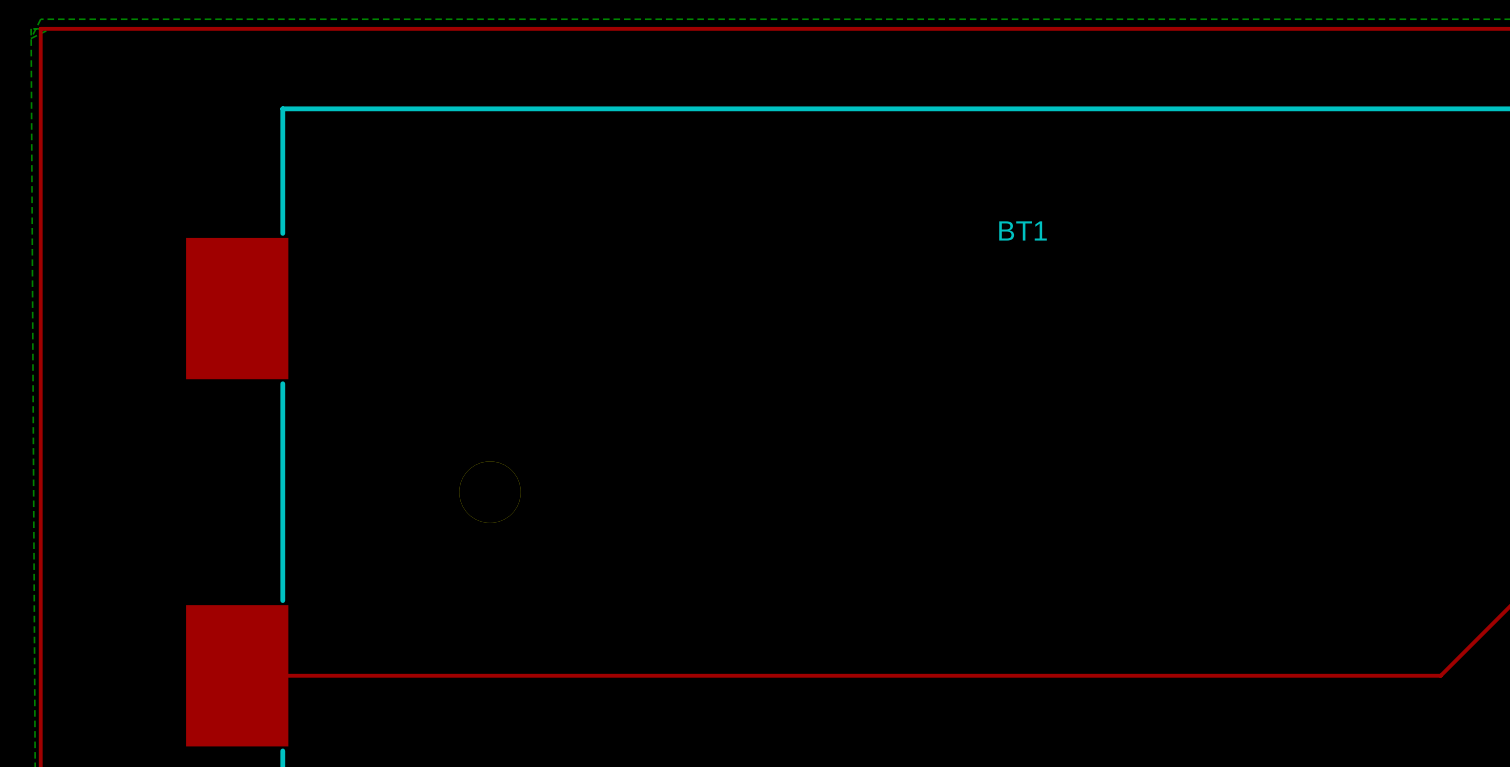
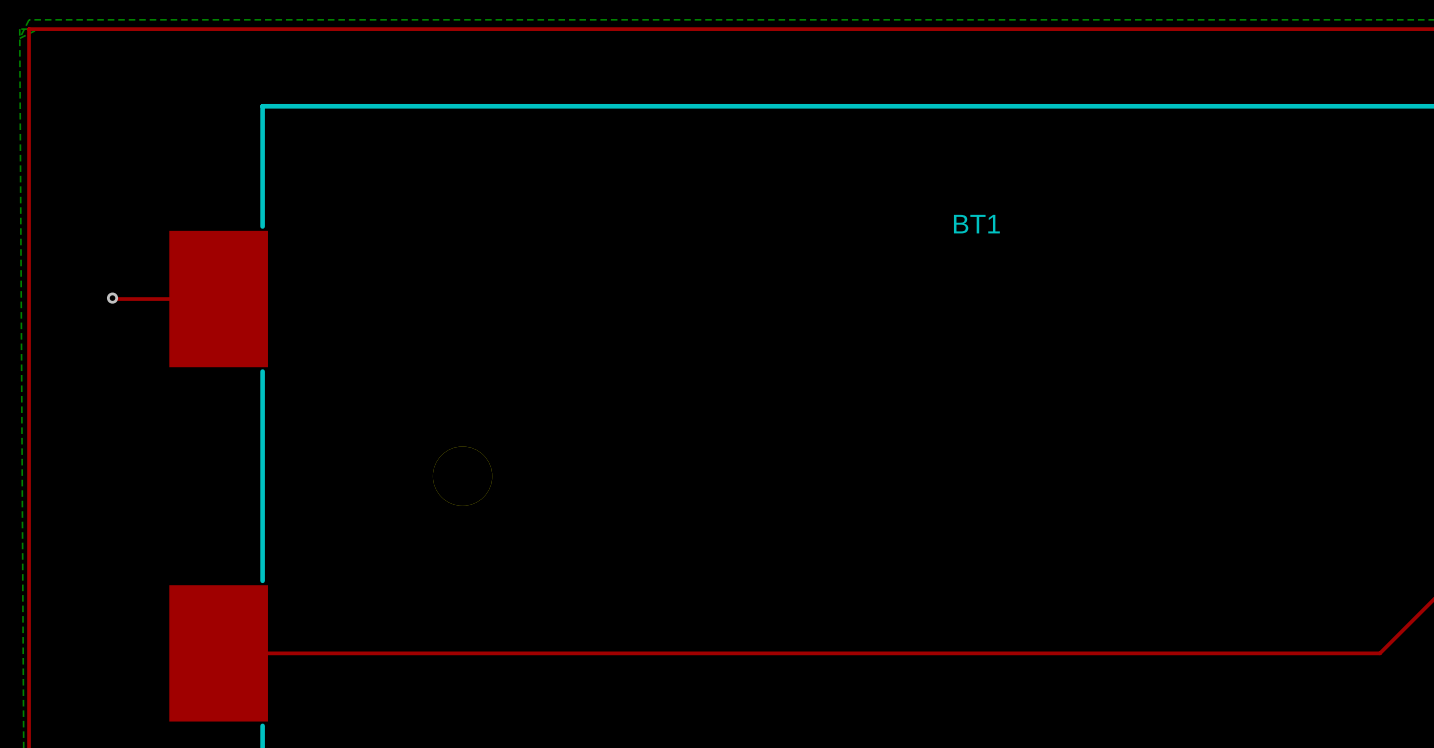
top track: none -> (112, 298) (218, 299)
via: none -> (112, 298)

